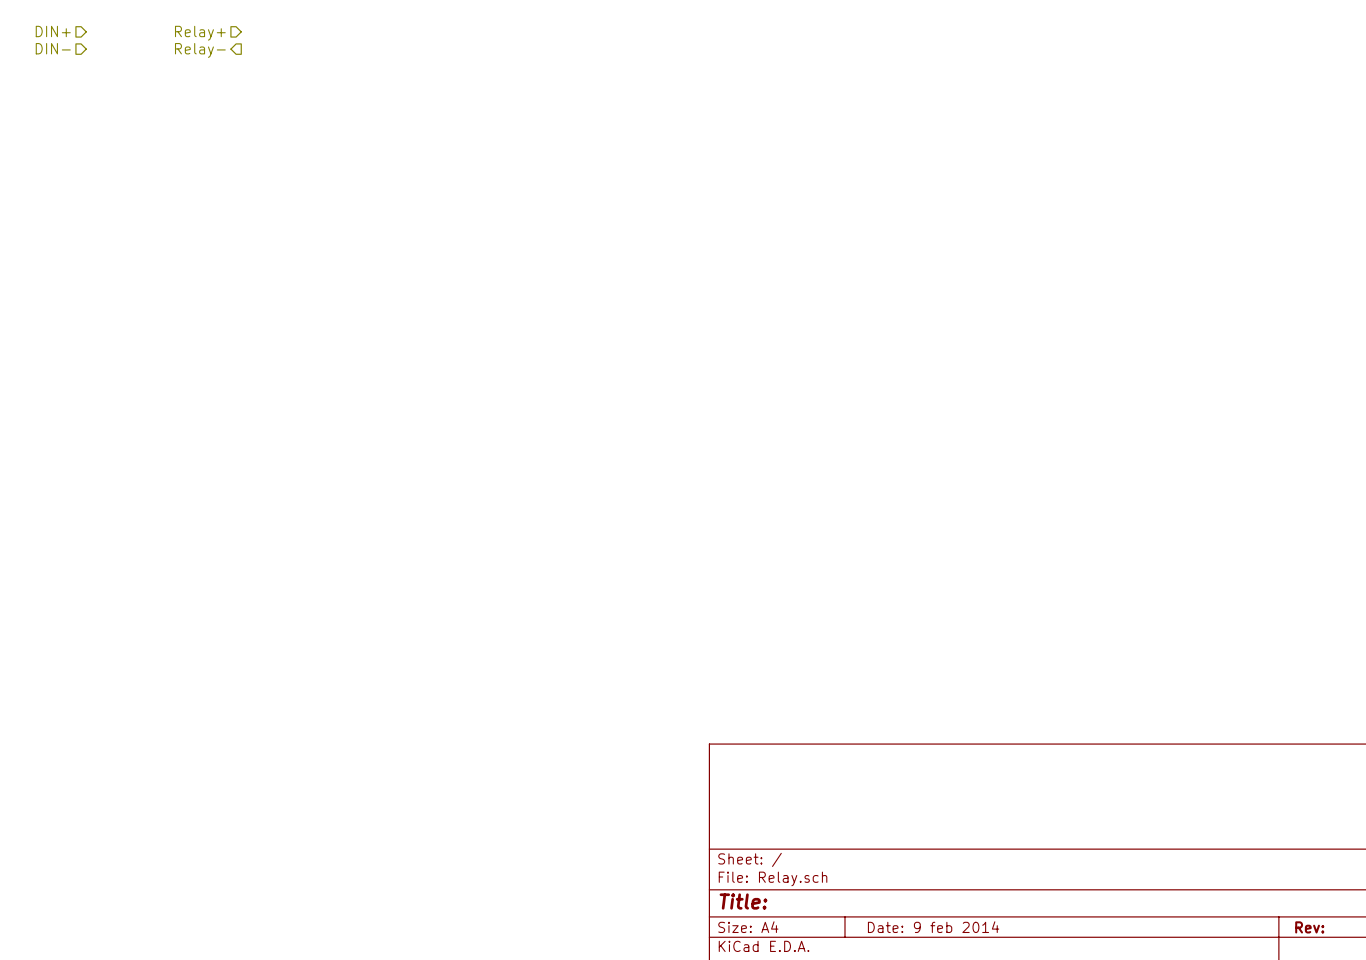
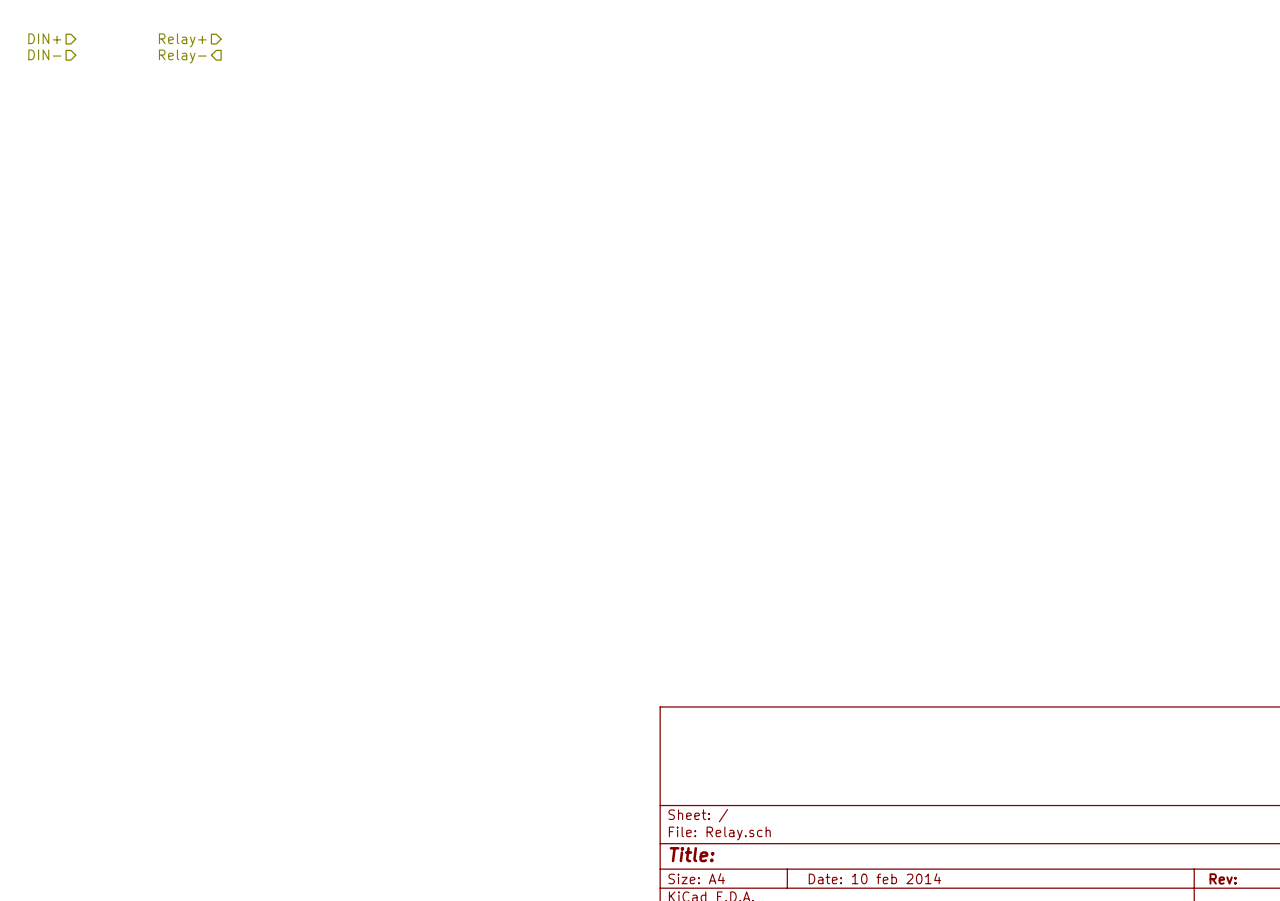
title block: Date: 9 feb 2014 (933, 927) -> Date: 10 feb 2014 (874, 878)

